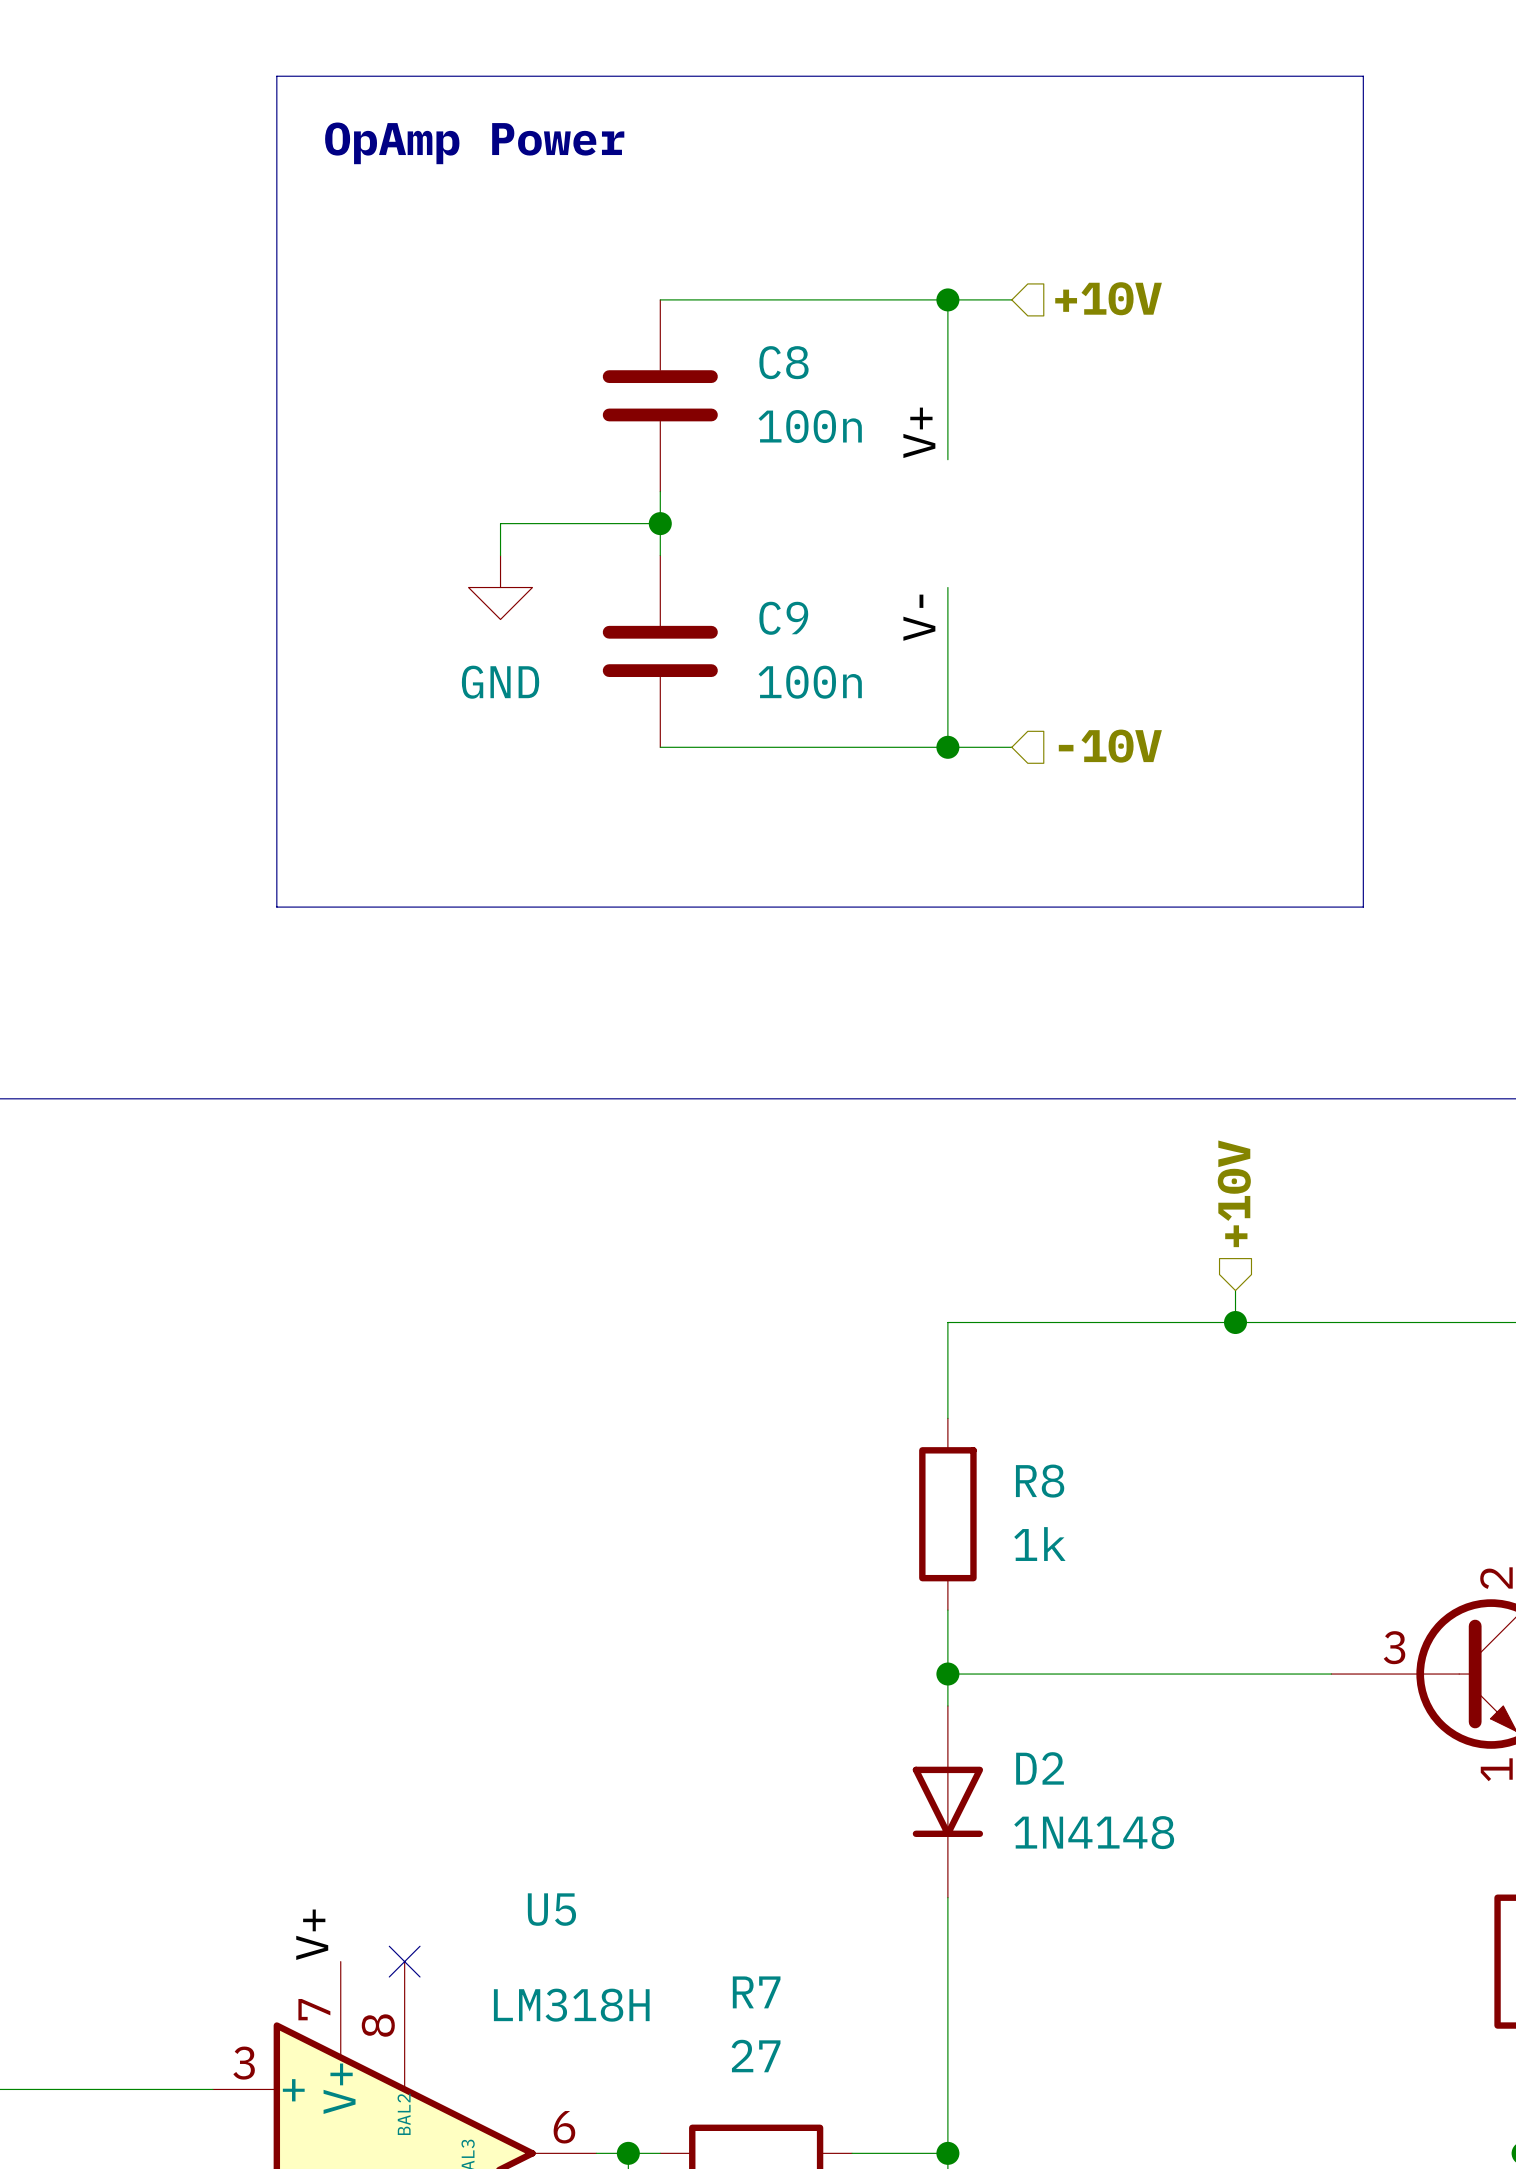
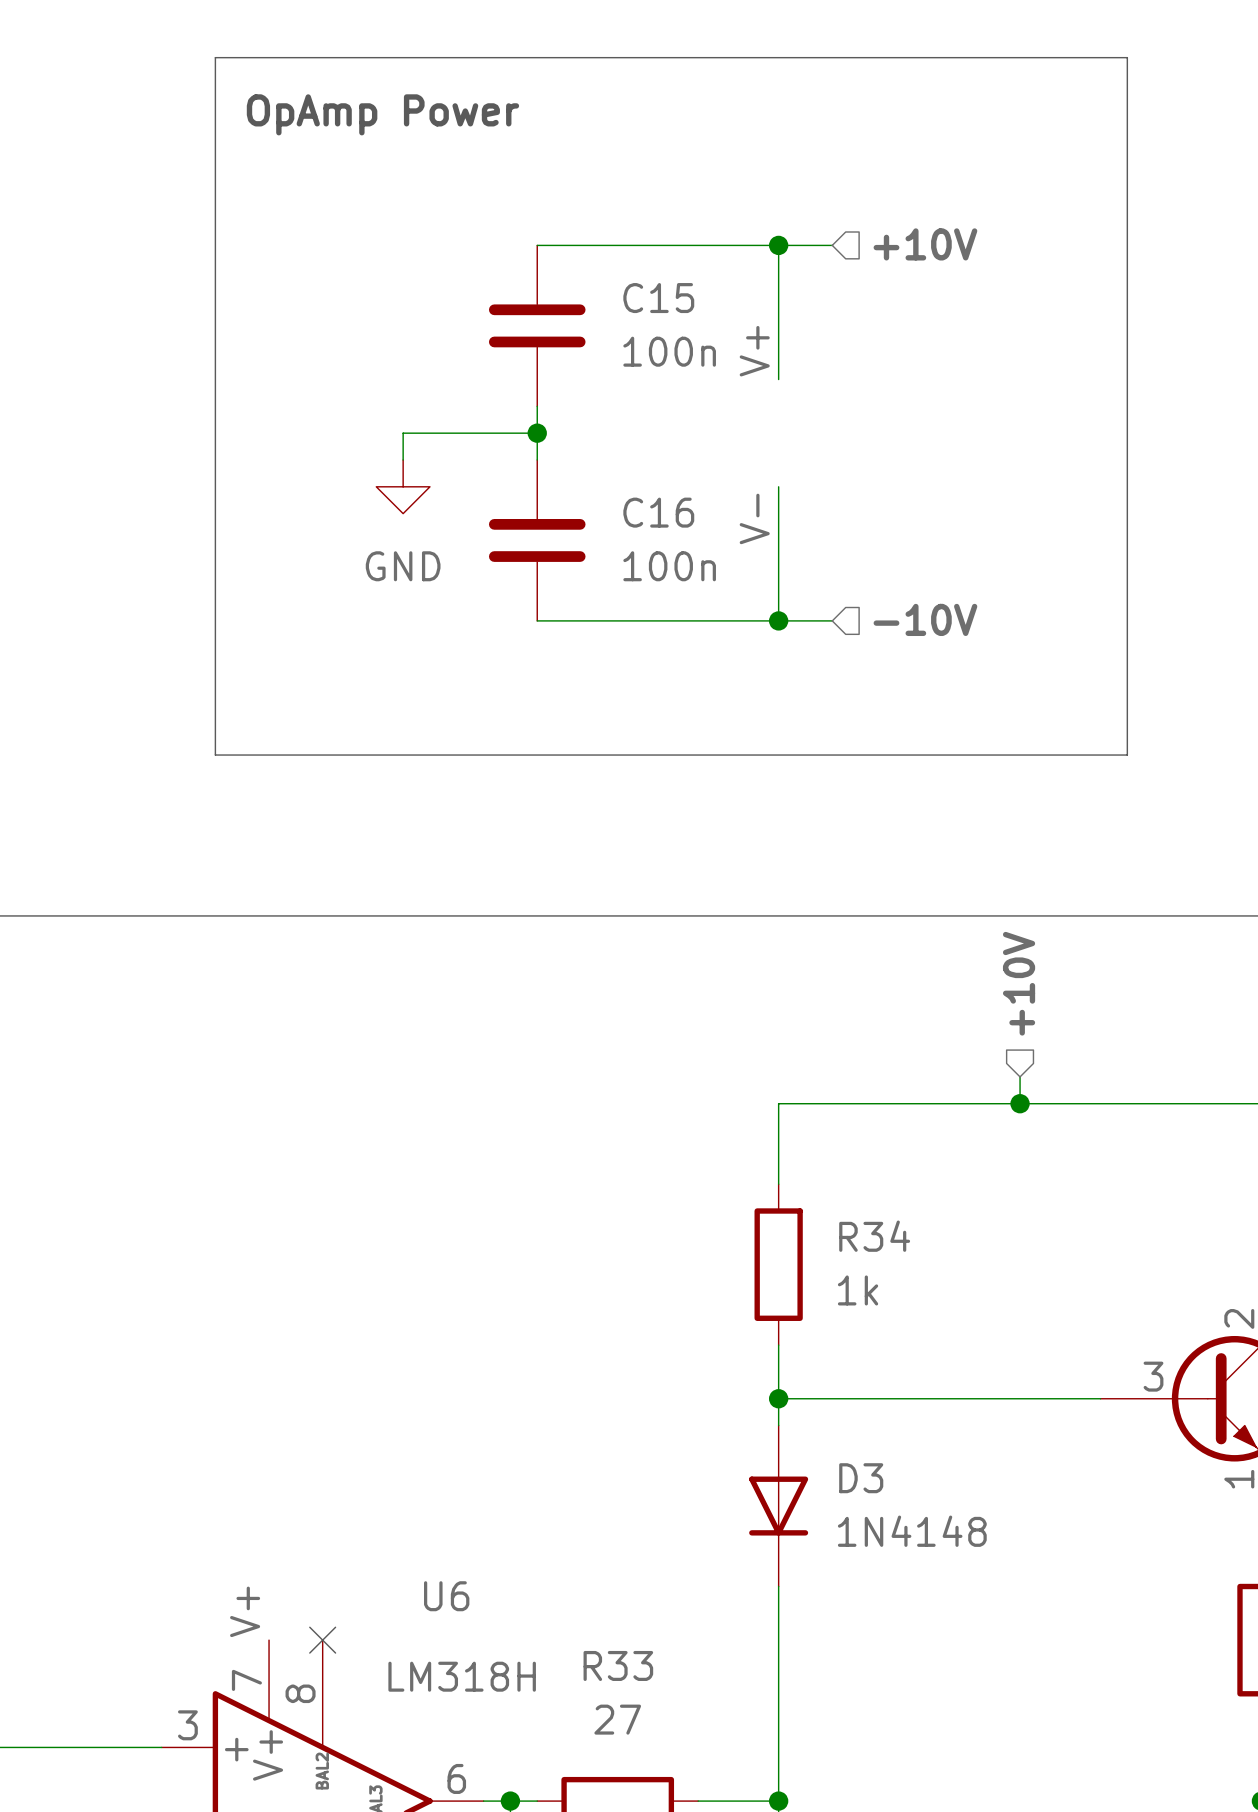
C8 name: C8 (783, 362) -> C15 (658, 298)
C9 name: C9 (783, 618) -> C16 (658, 512)
R8 name: R8 (1040, 1481) -> R34 (874, 1236)
D2 name: D2 (1040, 1768) -> D3 (861, 1478)
U5 name: U5 (551, 1909) -> U6 (446, 1596)
R7 name: R7 (756, 1992) -> R33 (618, 1665)

